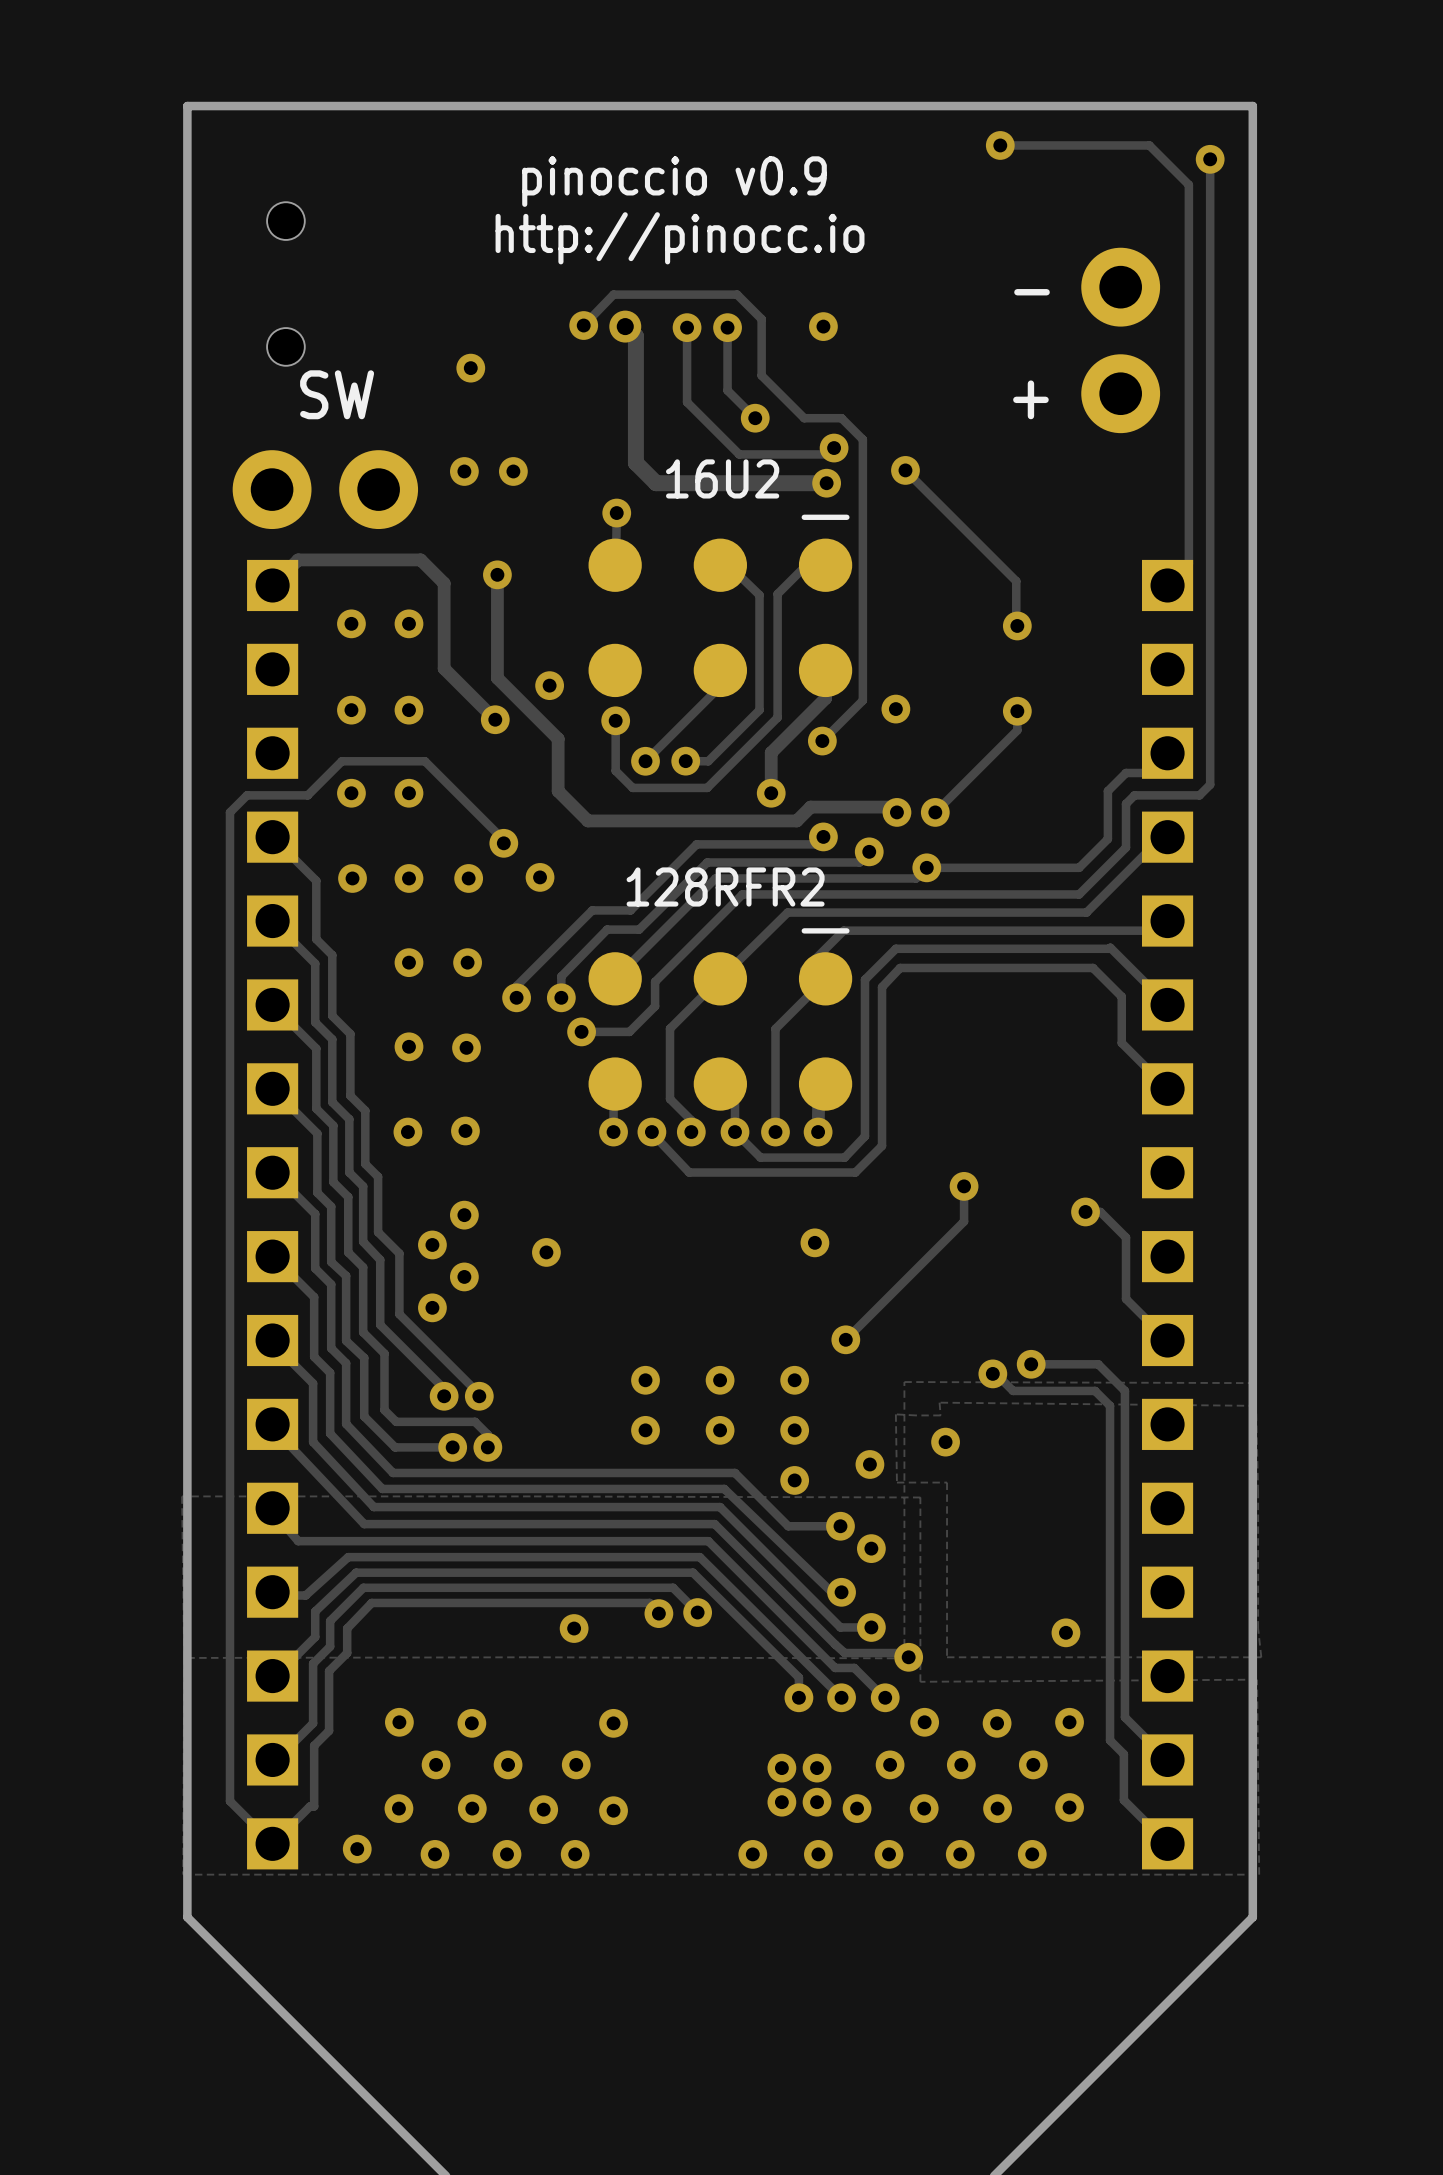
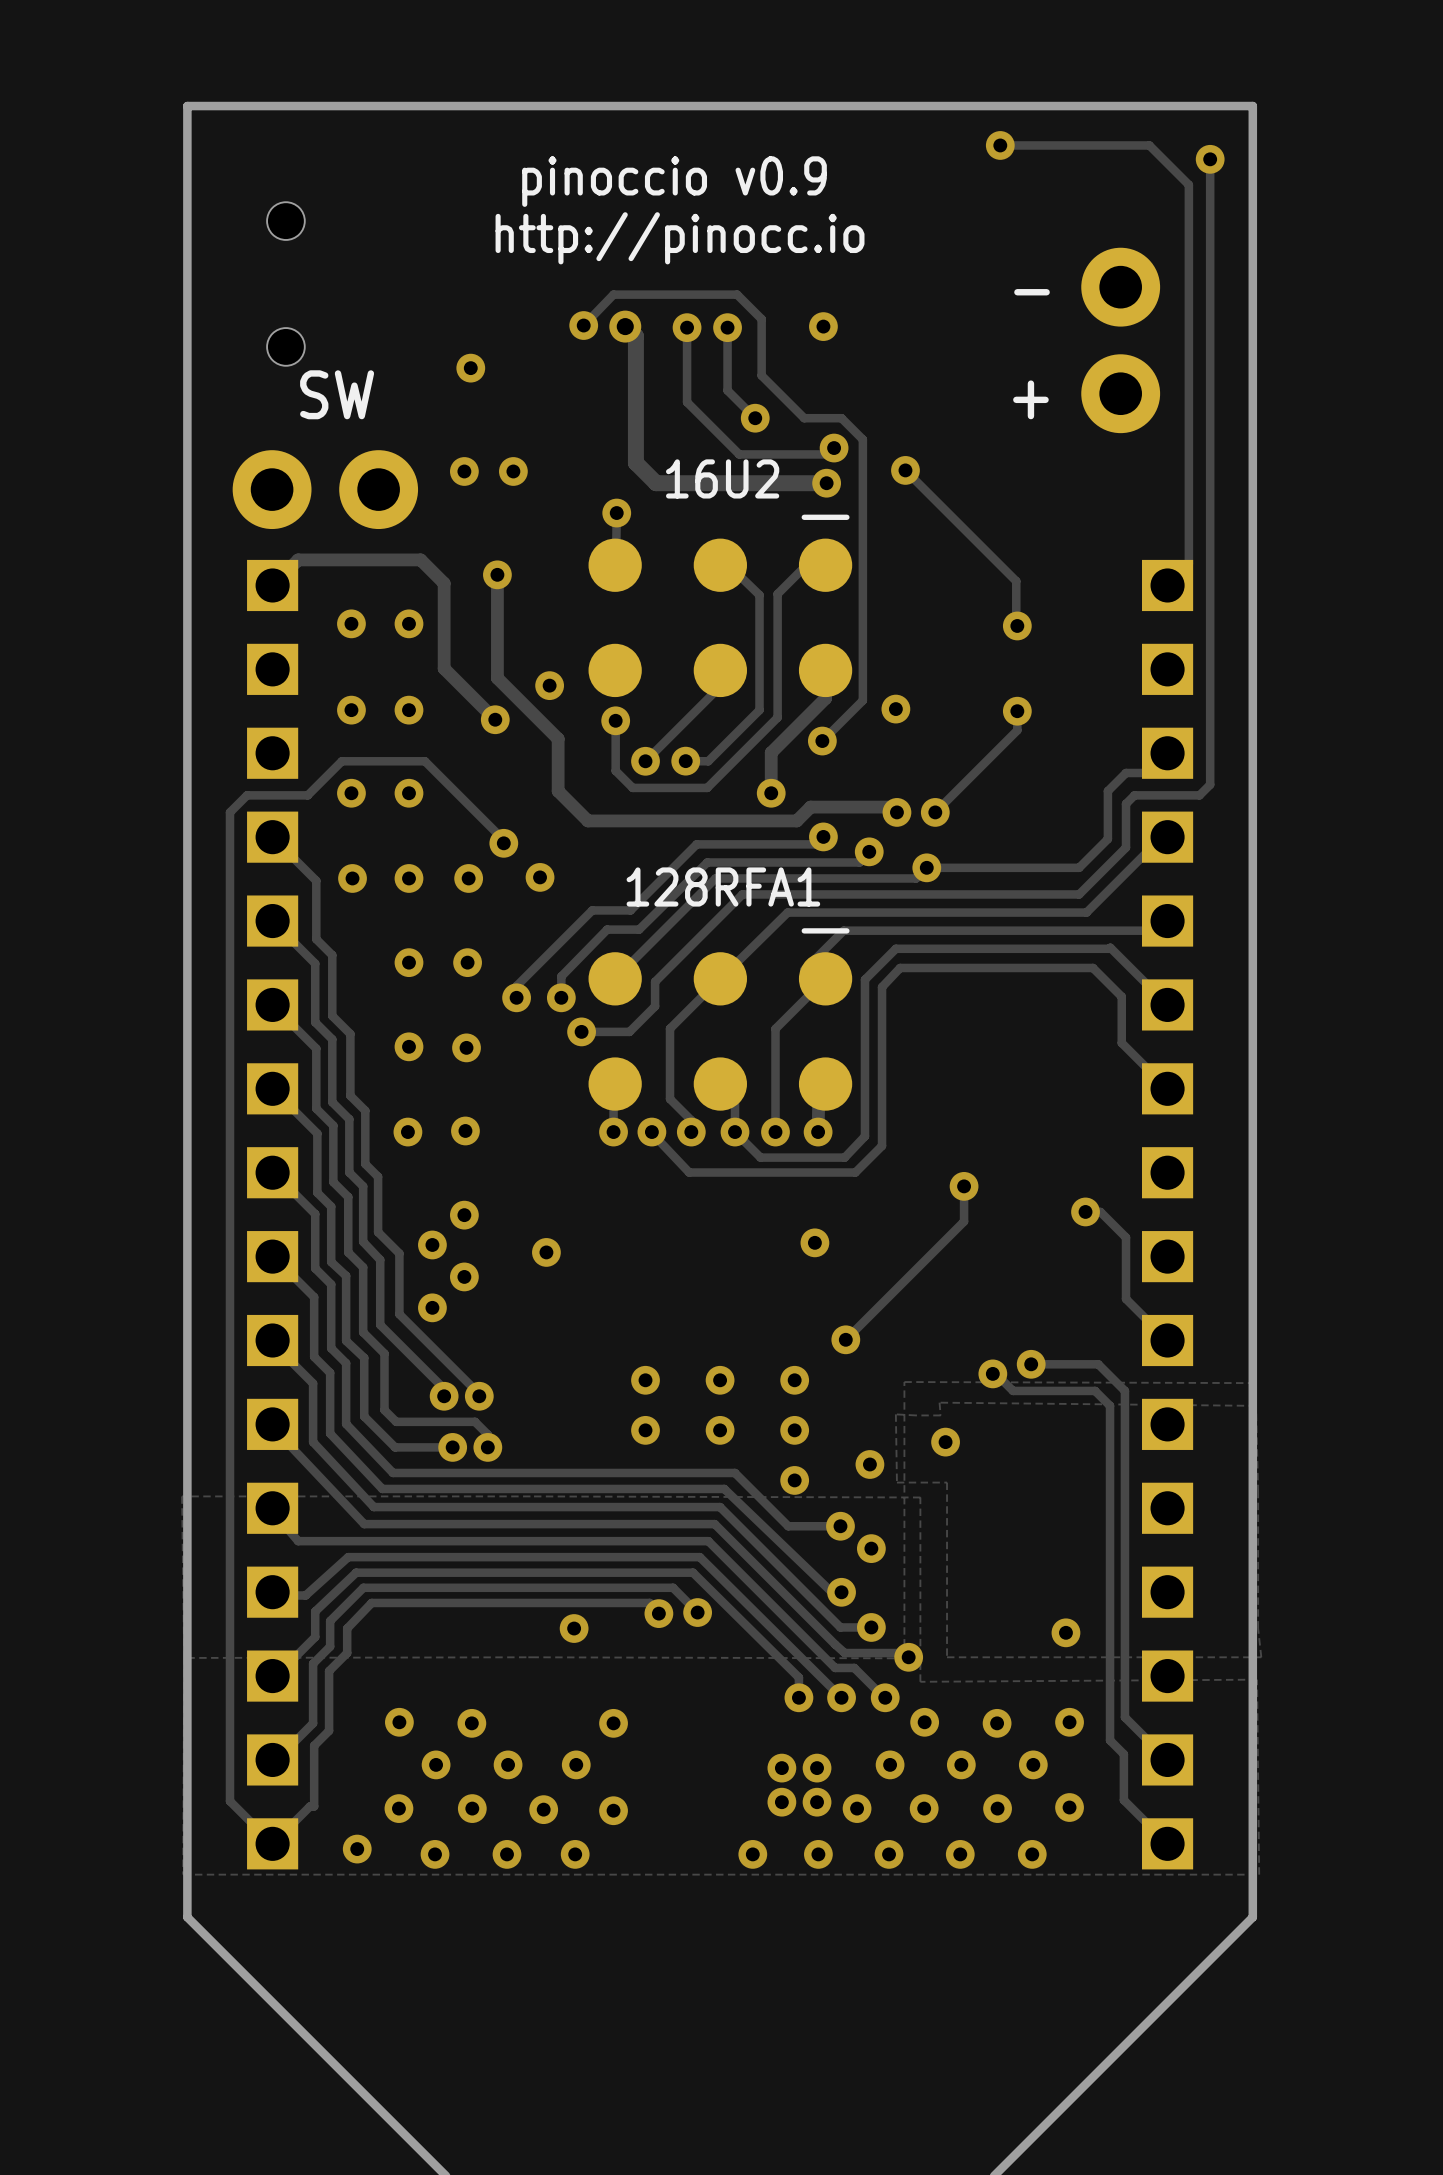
text: 128RFR2 (725, 886) -> 128RFA1 (723, 886)

